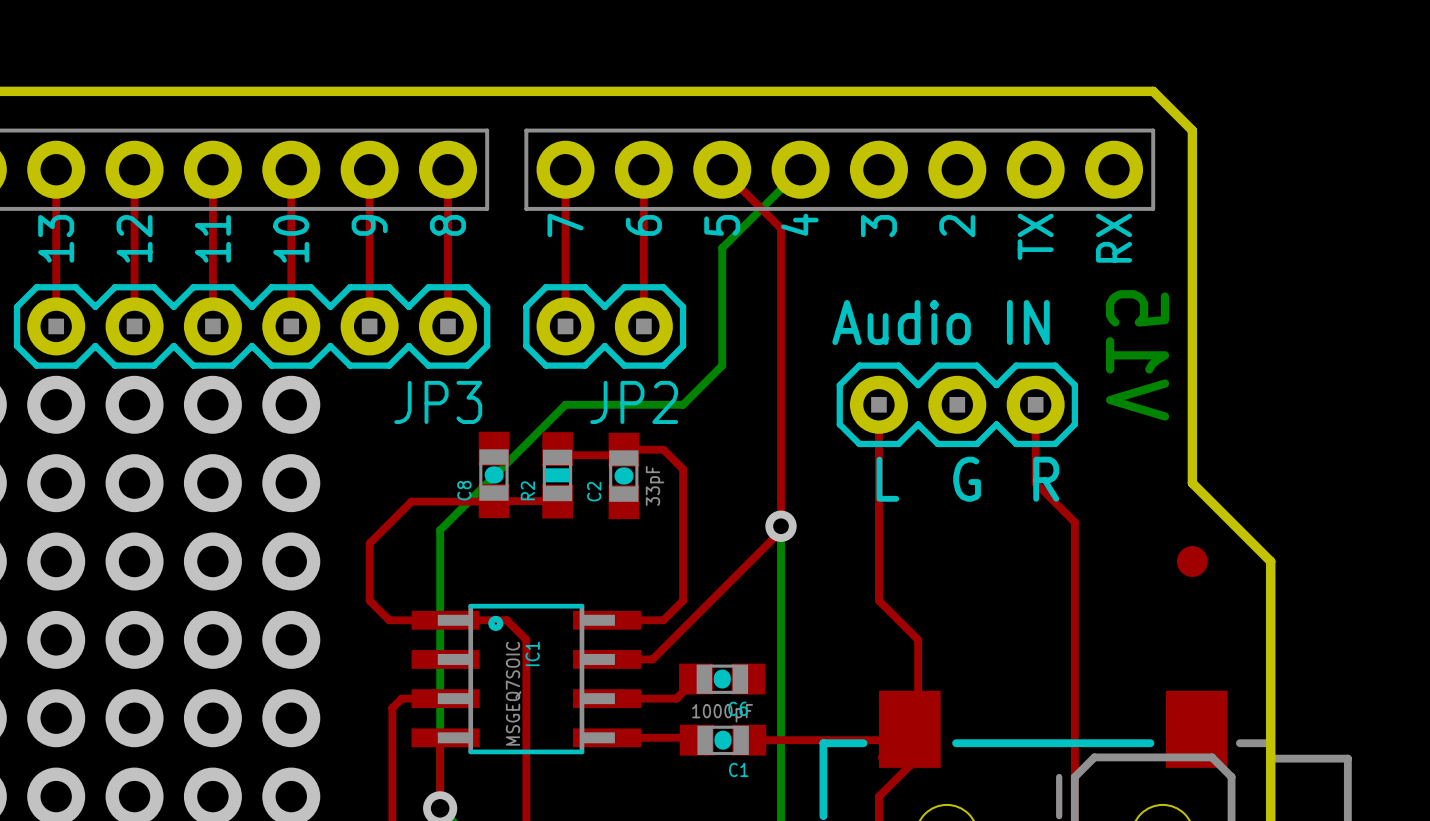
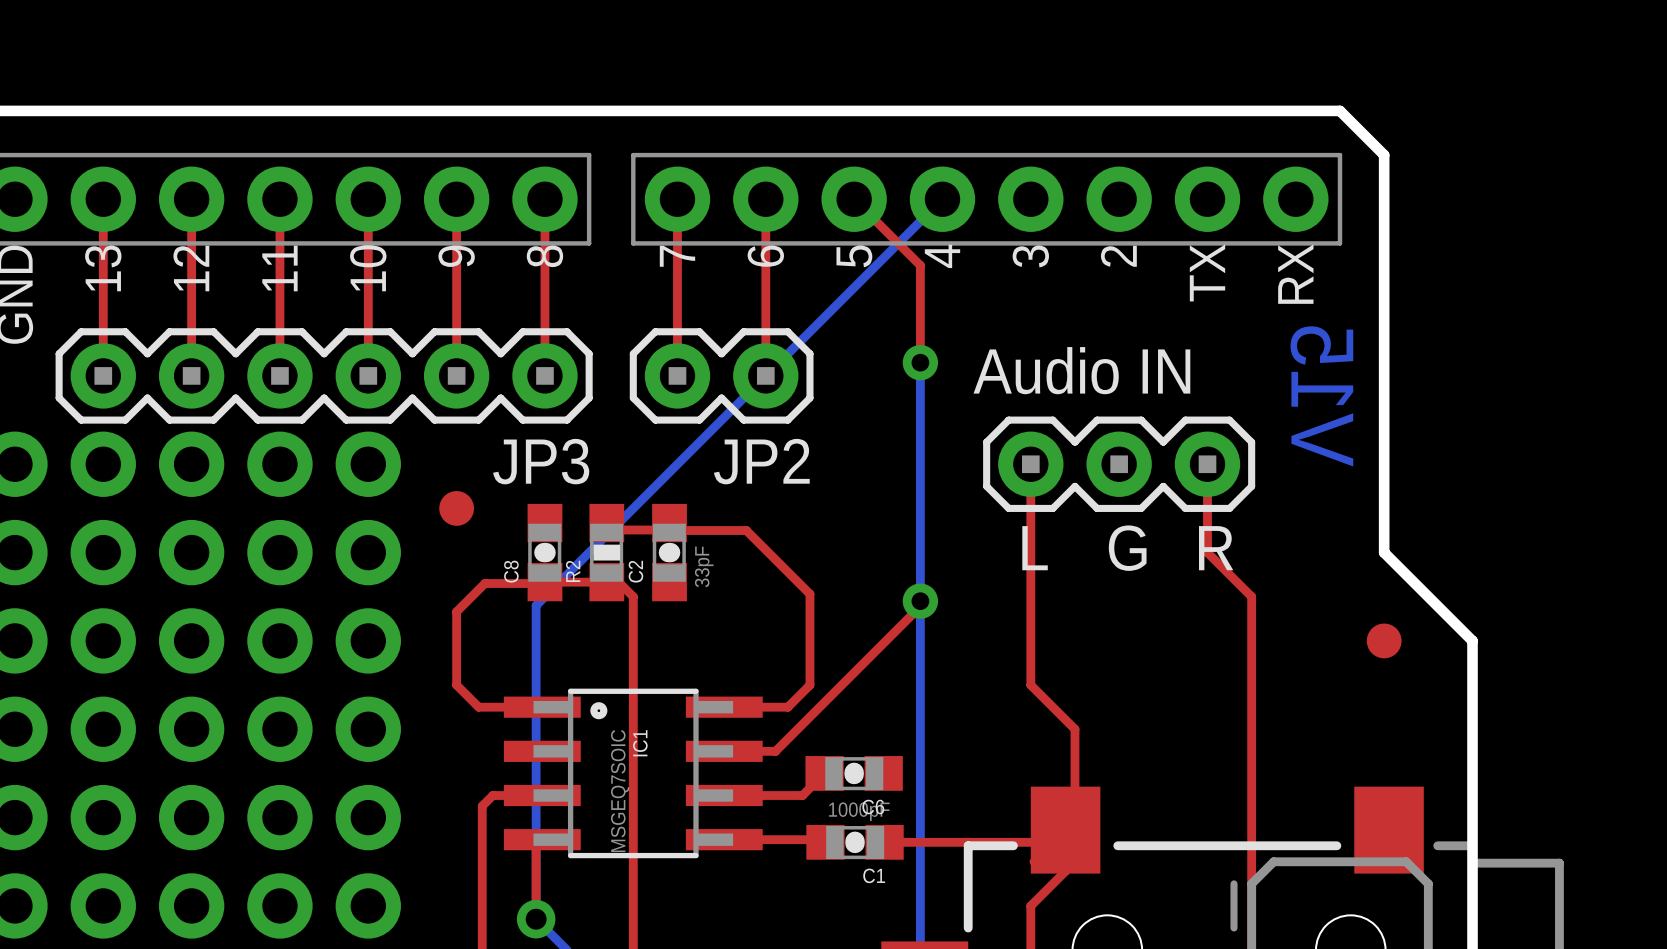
bottom track: (722, 248) (722, 365) (683, 404) (565, 404) -> (854, 287) (677, 464)
top track: (781, 314) (781, 526) -> none
bottom track: none -> (920, 362) (920, 601)
via: none -> (920, 362)
part: none -> (456, 508)
top track: (557, 449) (563, 455) (618, 455) (624, 449) (663, 449) (683, 469) (683, 519) -> (606, 523) (613, 529) (662, 529) (669, 523) (678, 530) (746, 530) (809, 594)
C8 position: (494, 474) -> (544, 552)
R2 position: (557, 475) -> (606, 552)
C2 position: (623, 475) -> (669, 552)
top track: (557, 501) (411, 501) (369, 543) -> none
top track: (445, 620) (506, 620) (526, 639) -> (456, 620) (456, 611) (484, 583) (618, 582) (633, 596) (633, 729)

